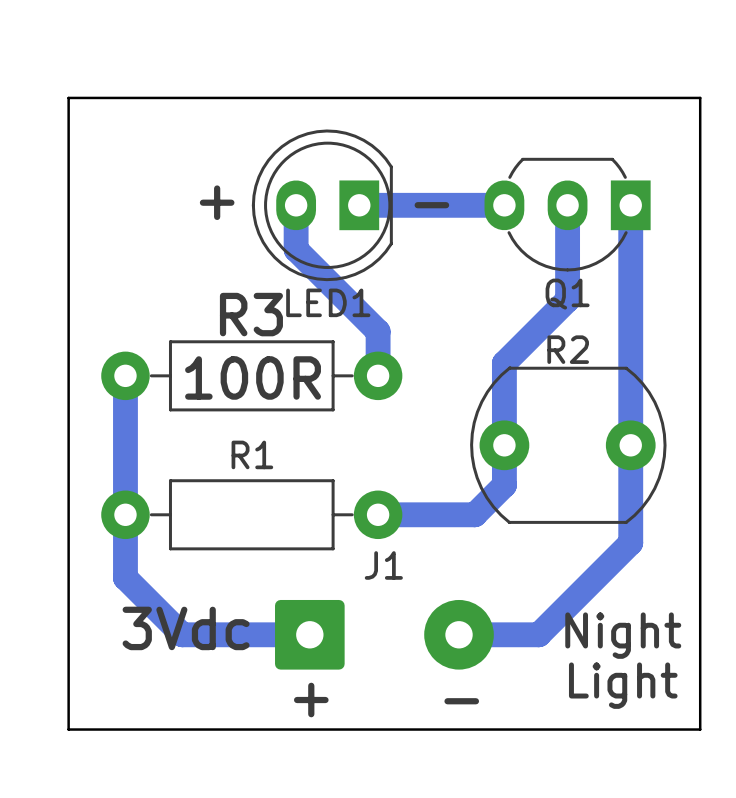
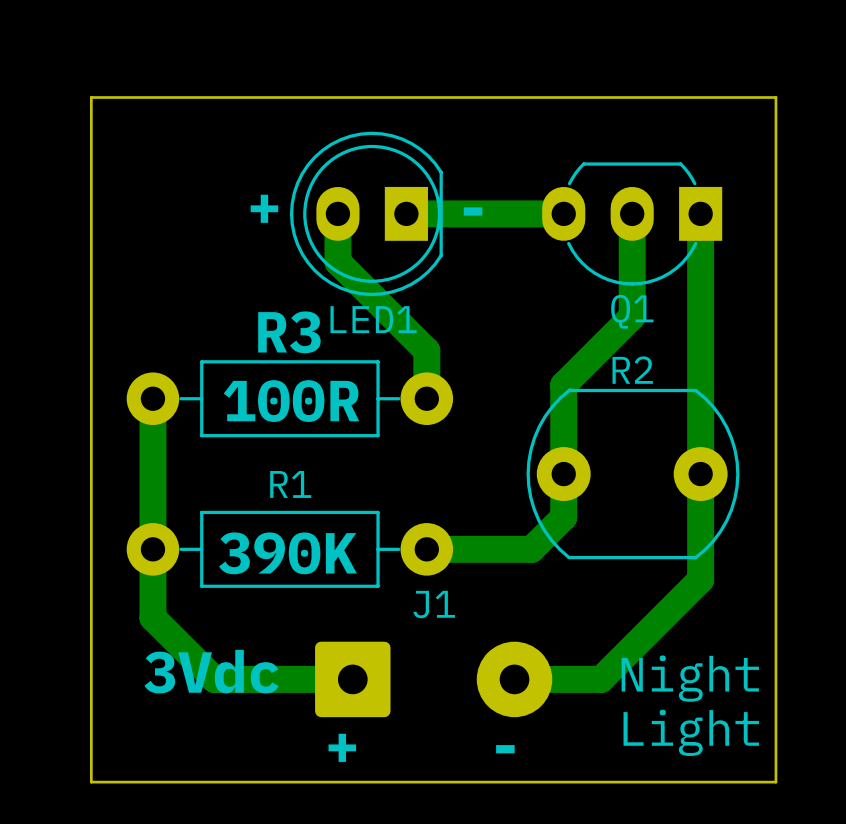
R1 value: none -> 390K (287, 553)

